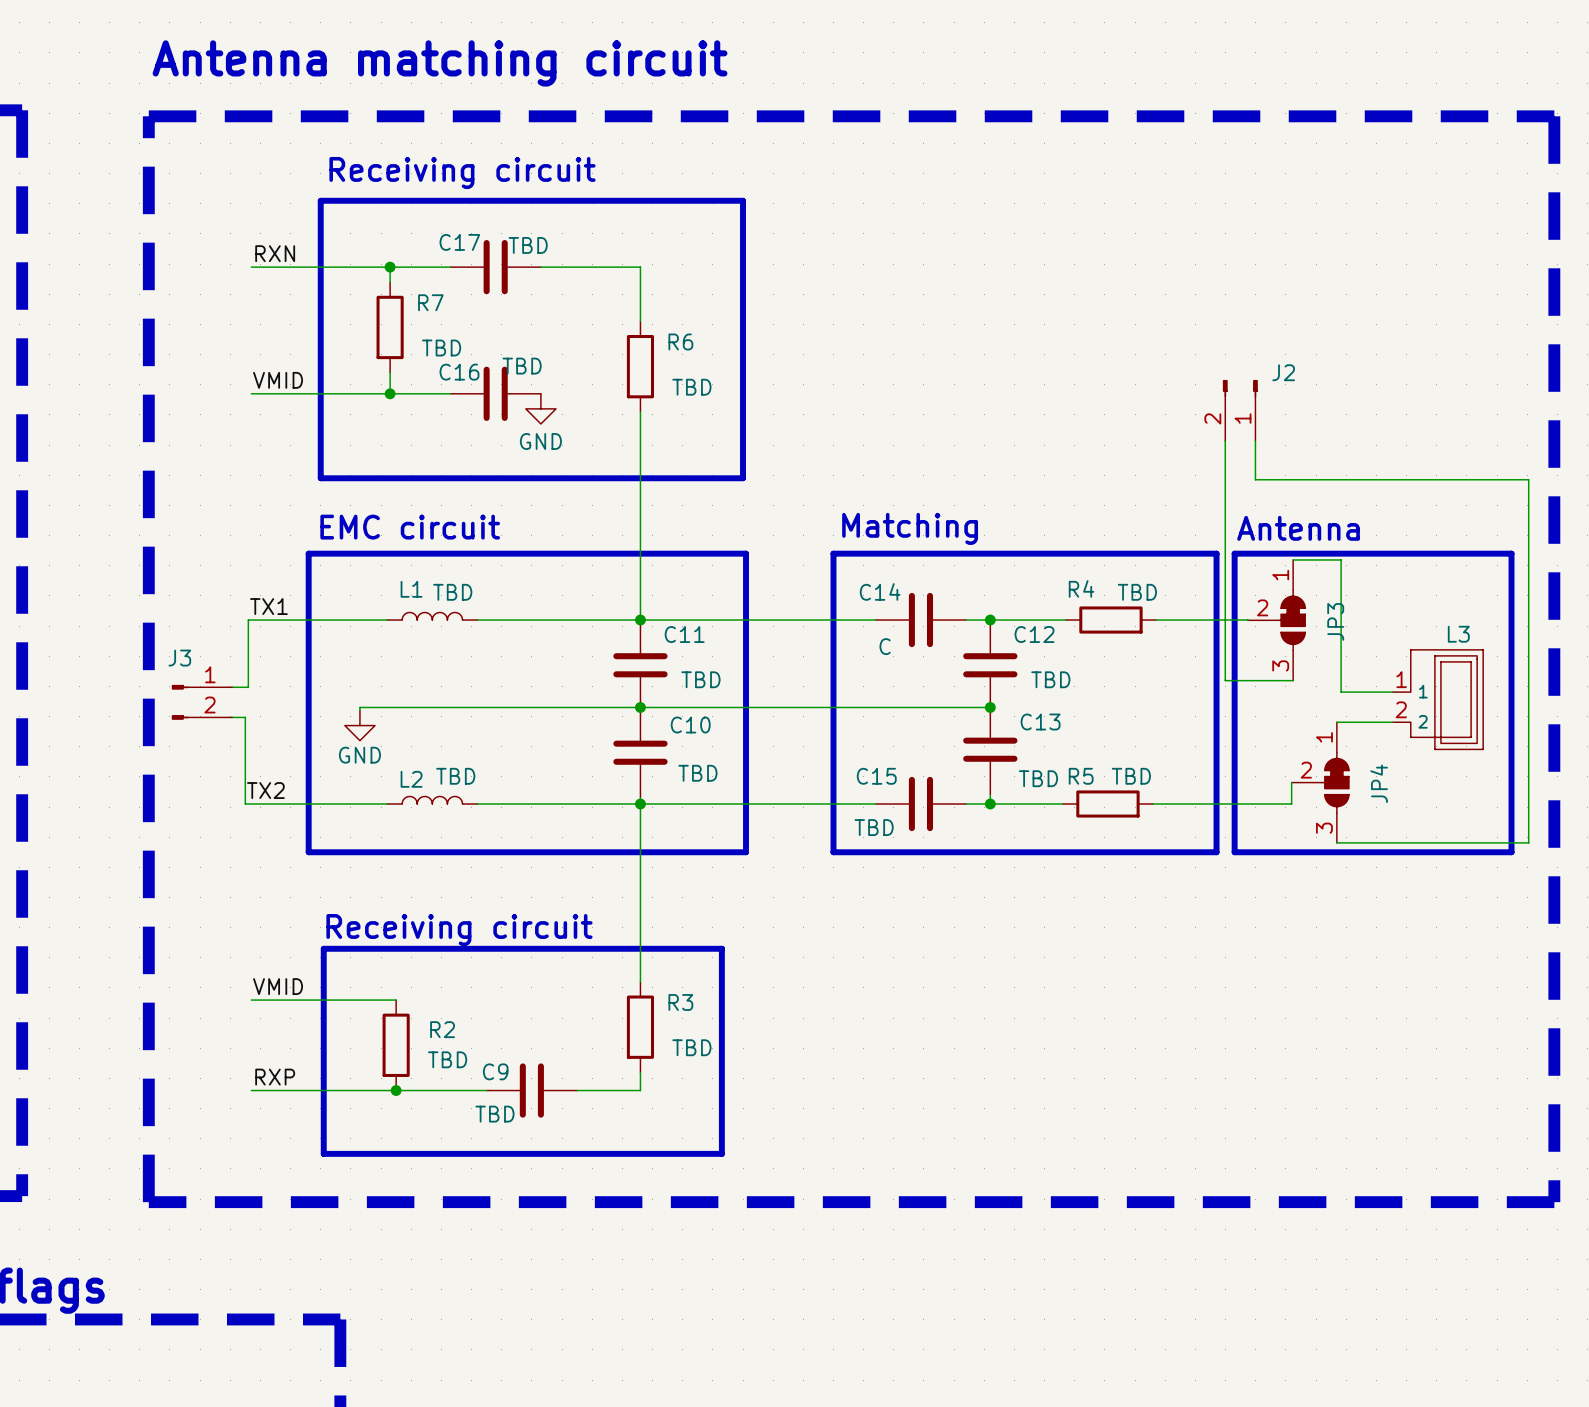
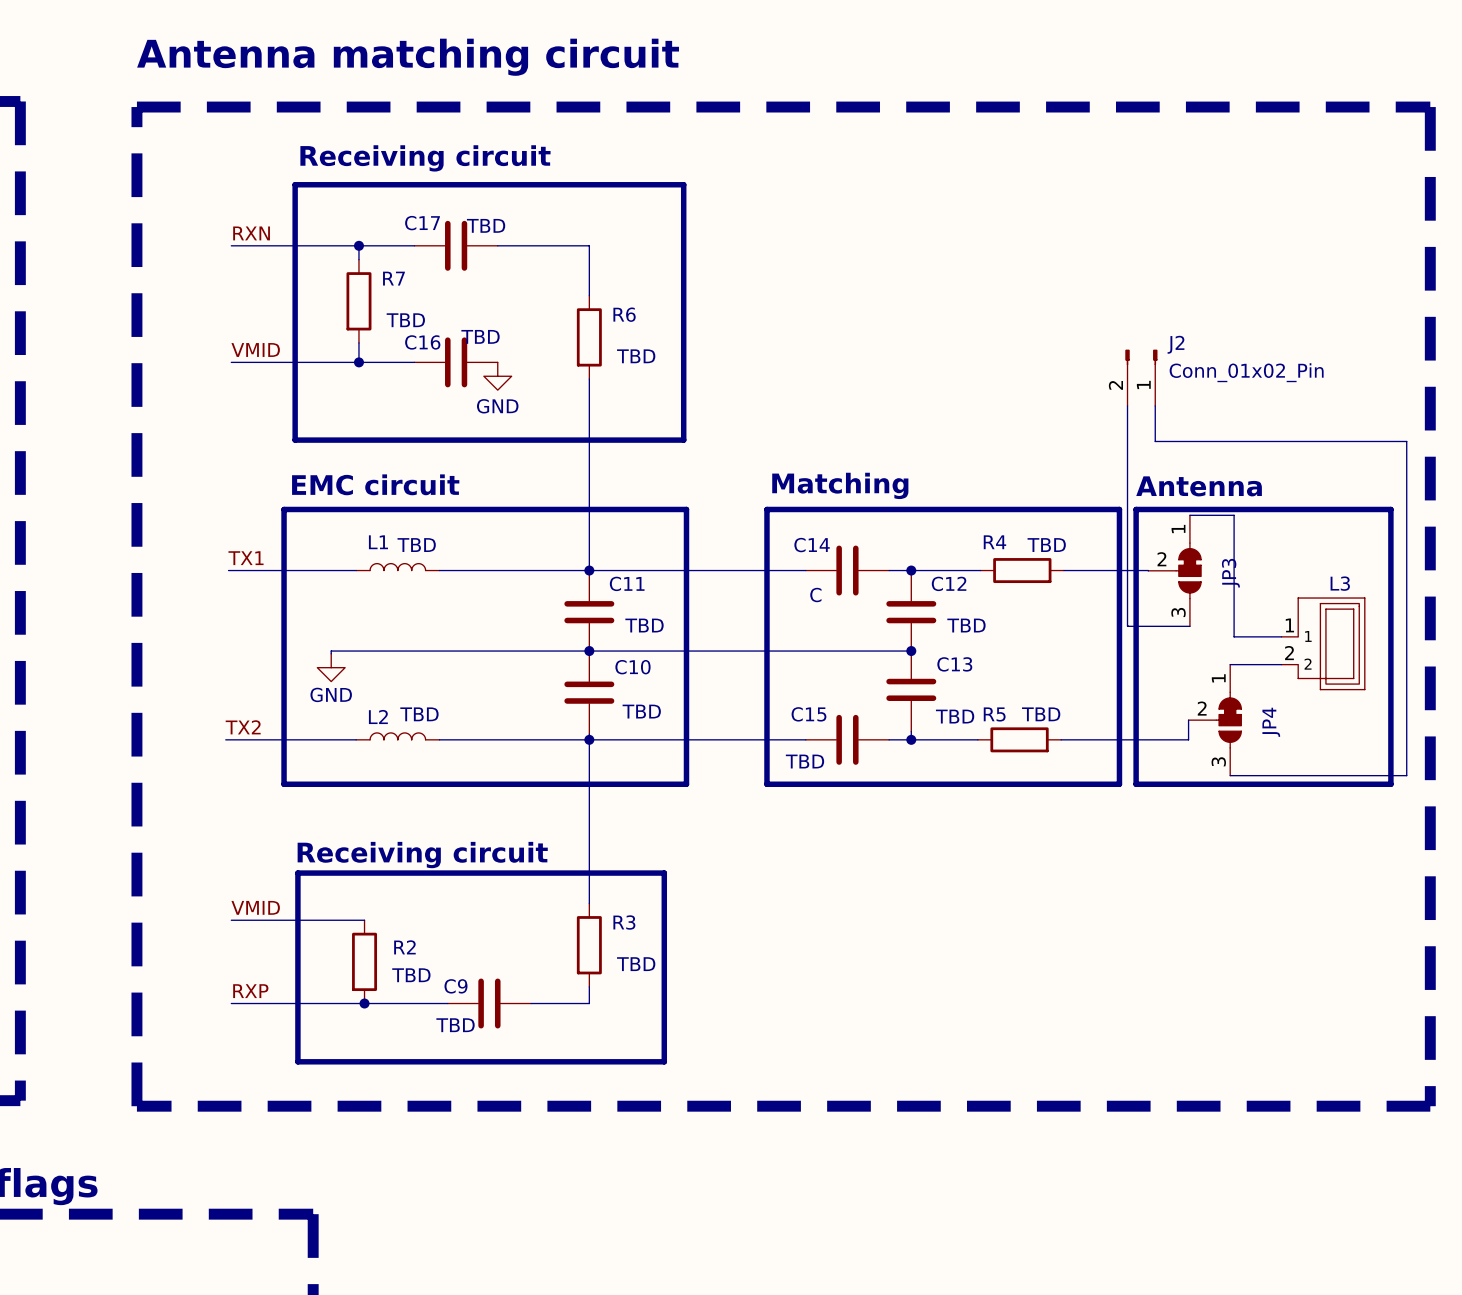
J2 value: none -> Conn_01x02_Pin (1246, 372)
wire: (248, 620) (248, 687) (232, 687) -> none
J3: (202, 702) -> none
wire: (232, 717) (245, 717) (245, 804) -> none

